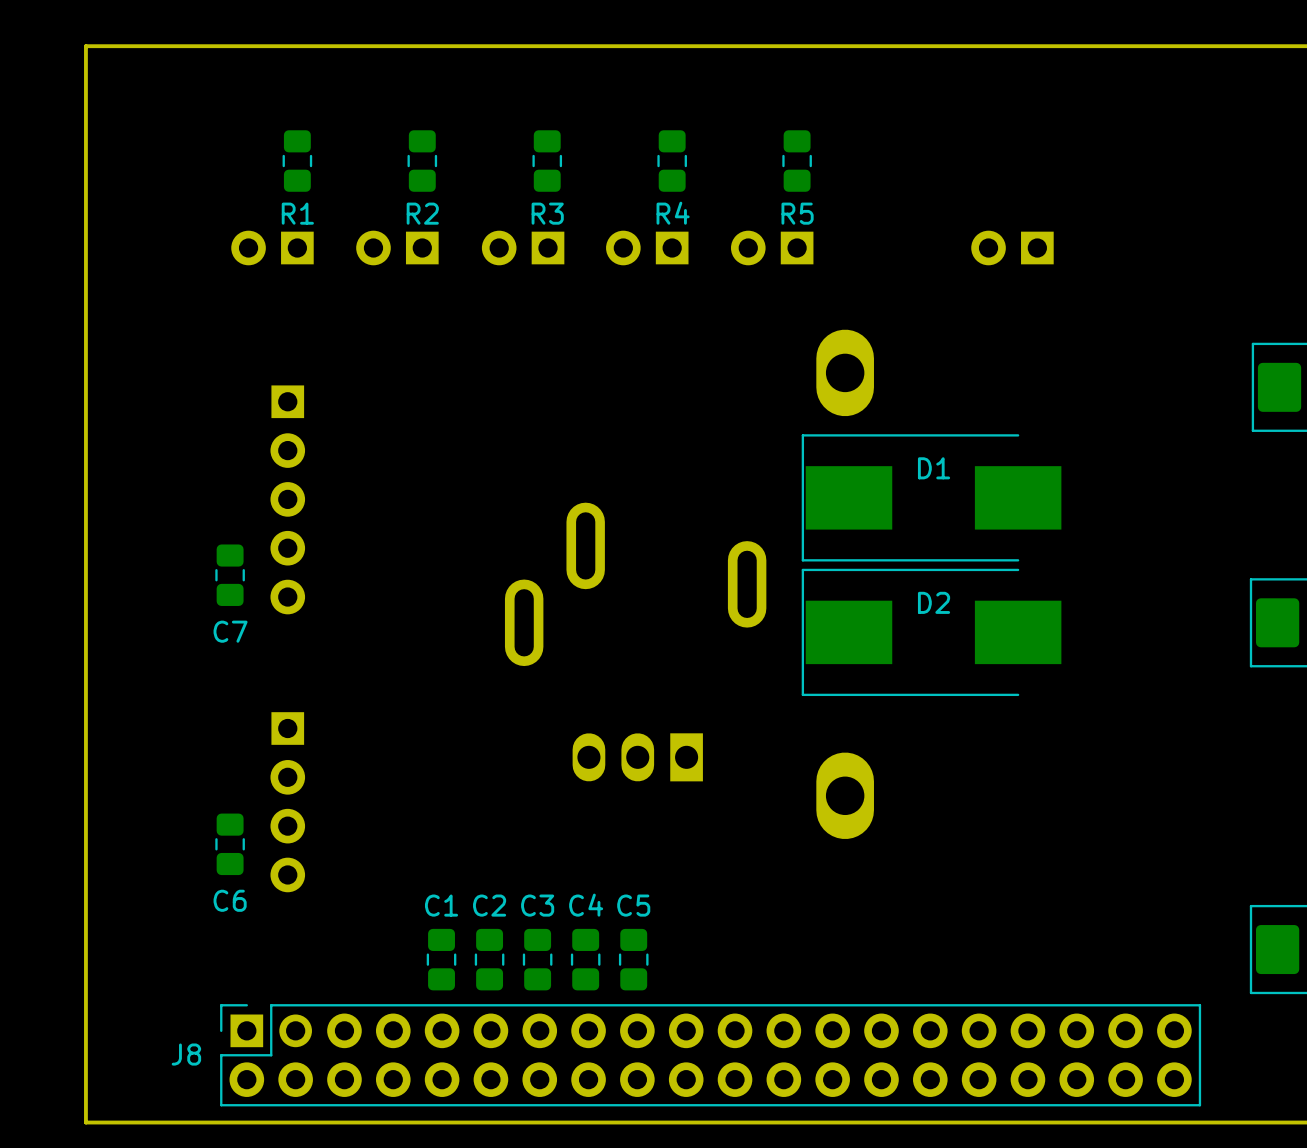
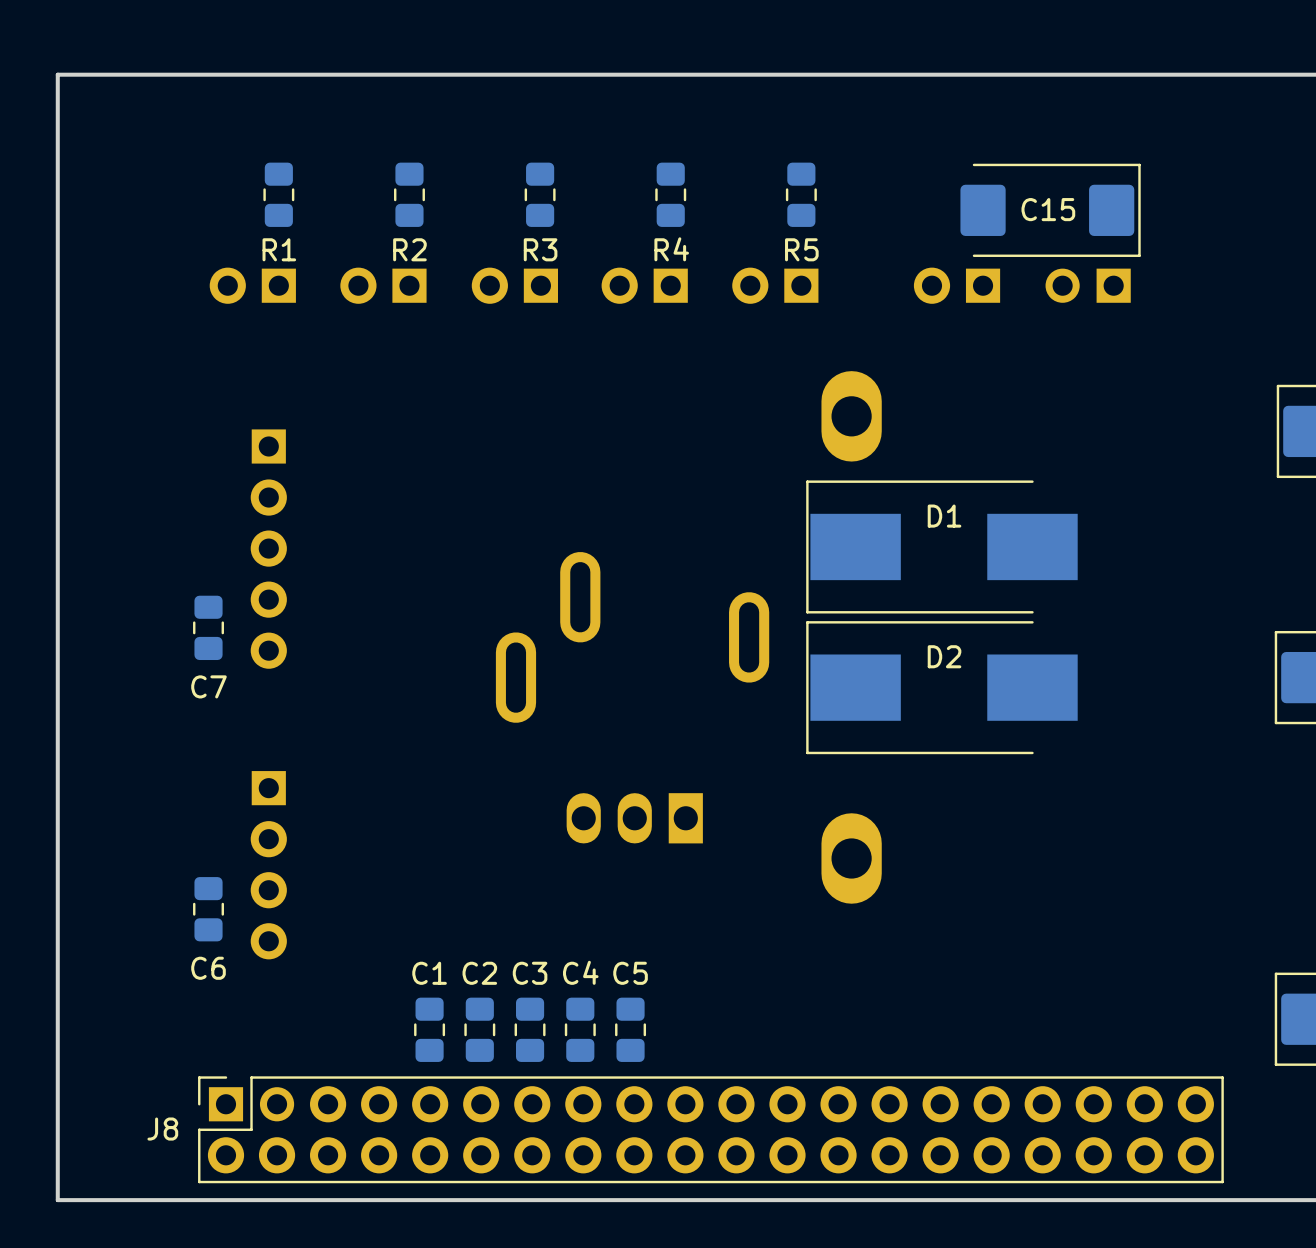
C15: none -> (1050, 210)
part position: (1012, 248) -> (957, 285)
part: none -> (1088, 285)

